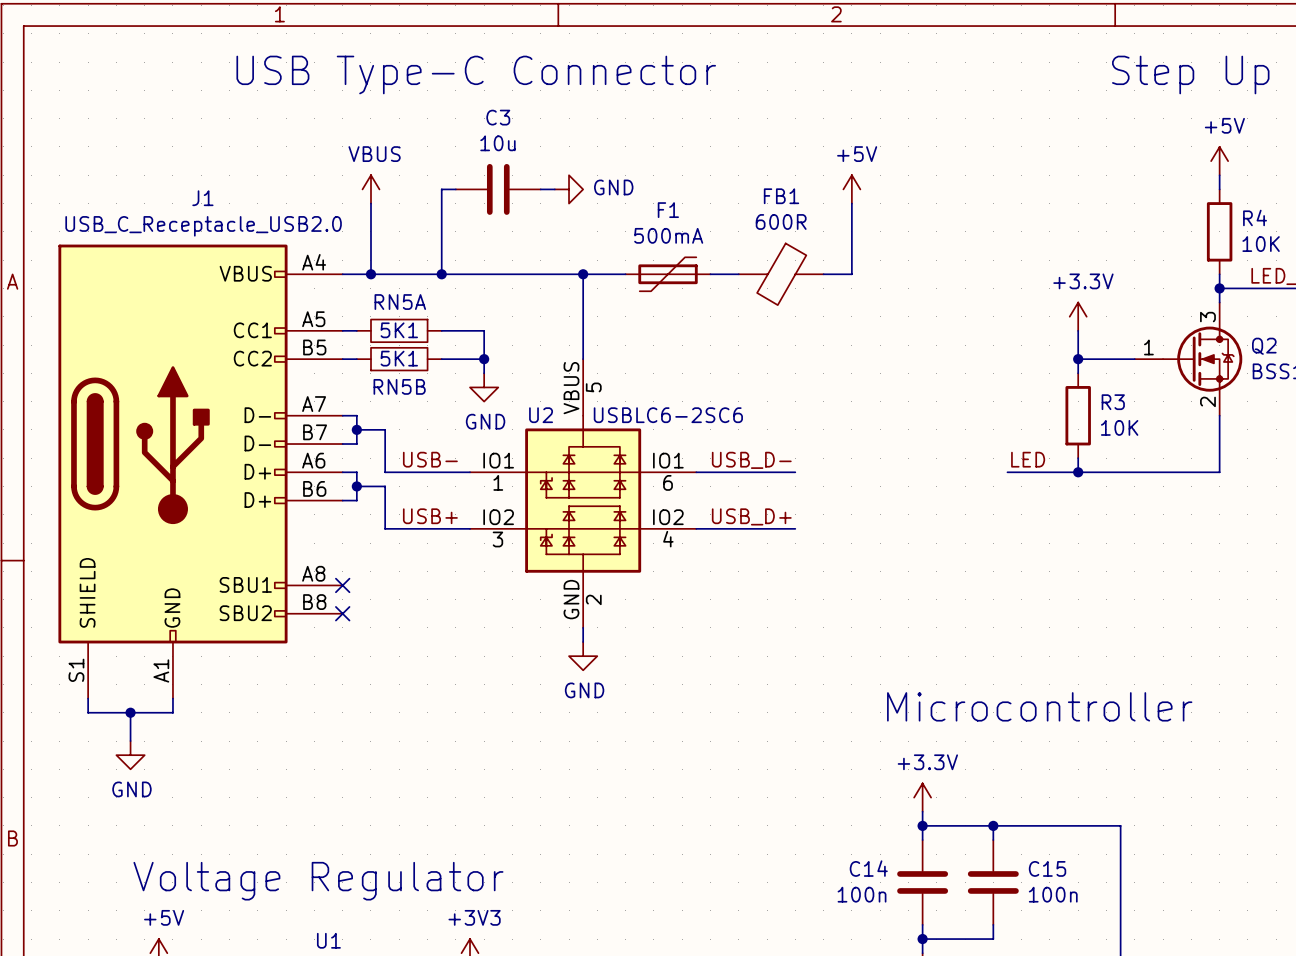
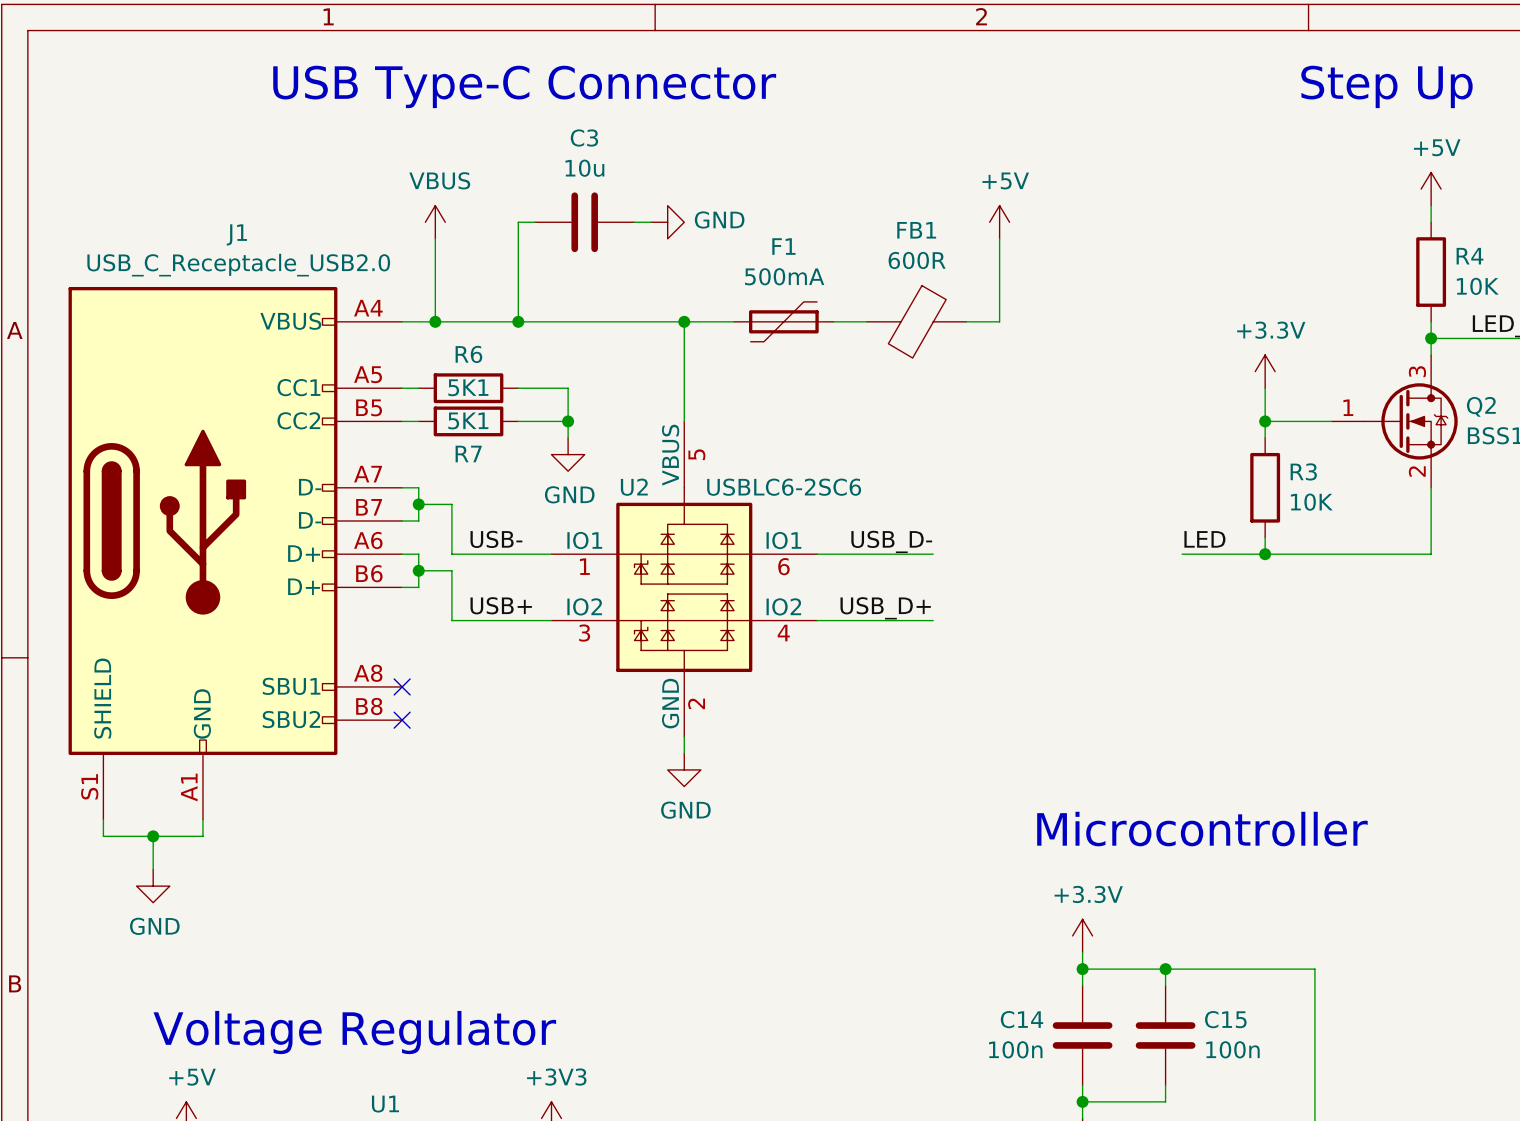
RN5A: 5K1 (399, 330) -> none
R6: none -> 5K1 (468, 388)
RN5B: 5K1 (399, 359) -> none
R7: none -> 5K1 (468, 421)

